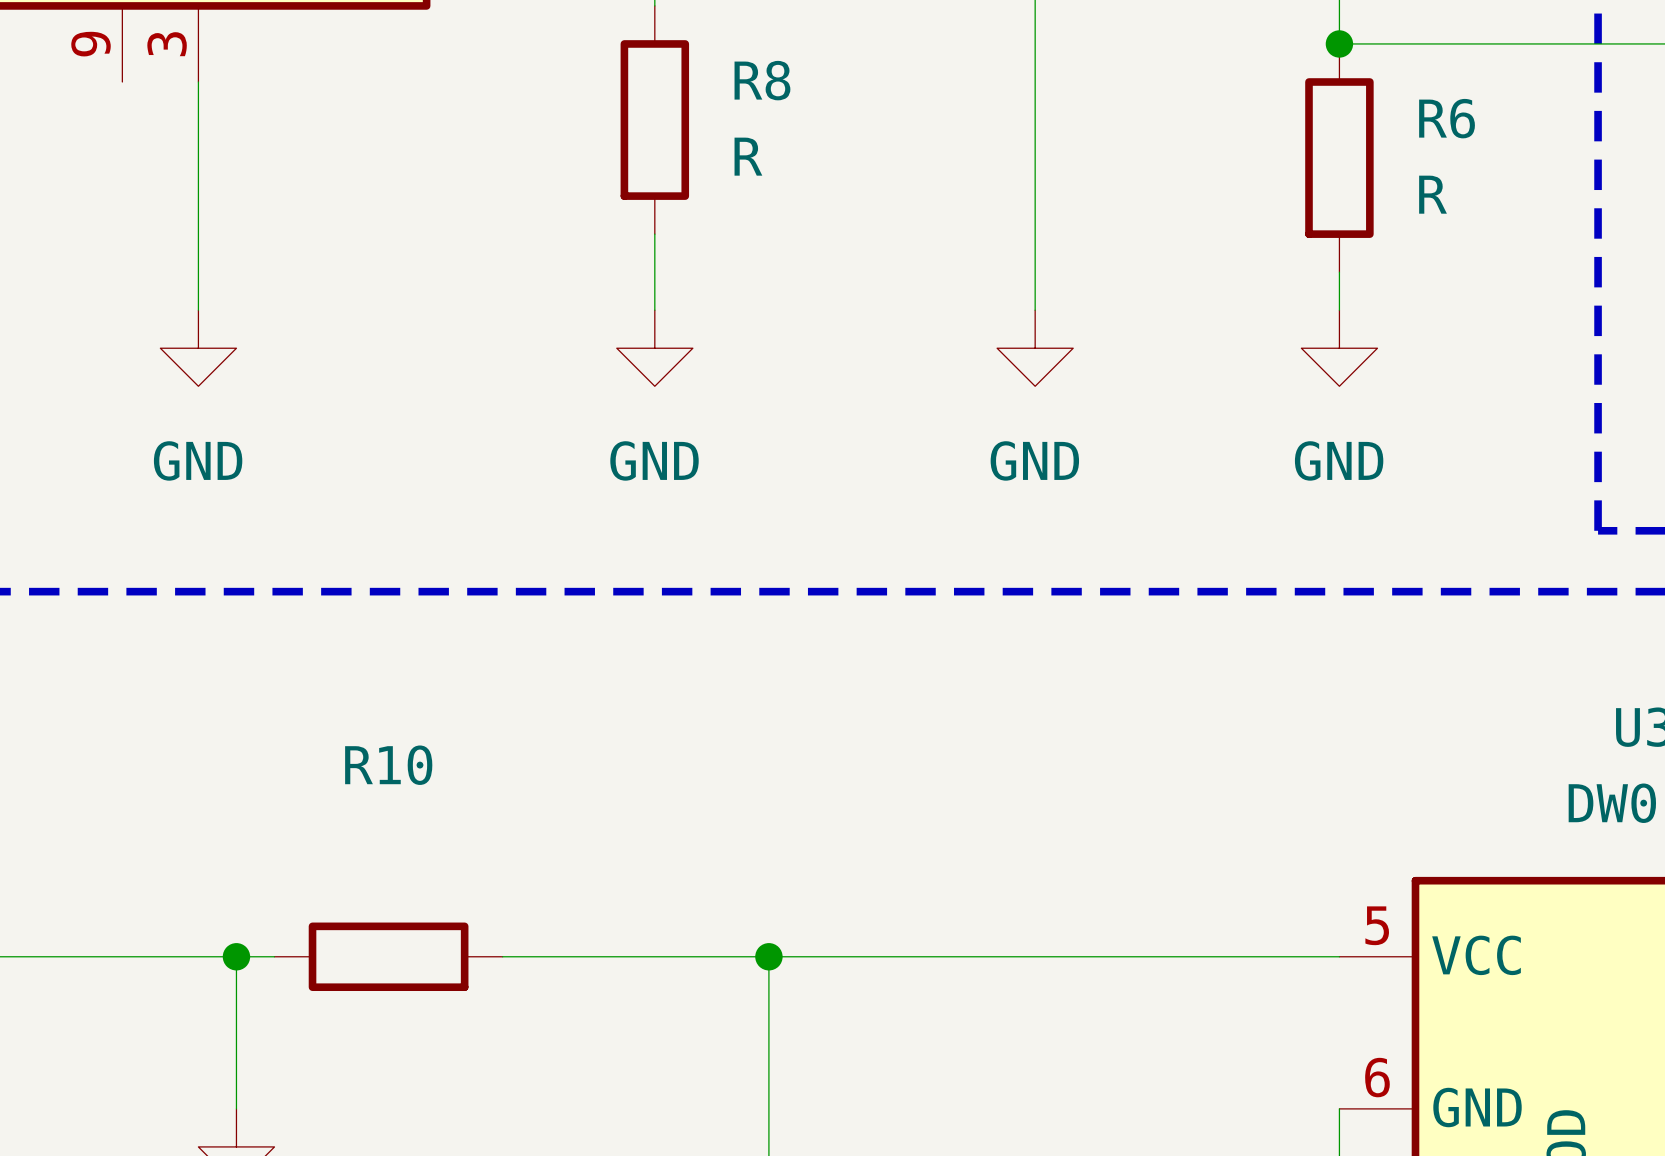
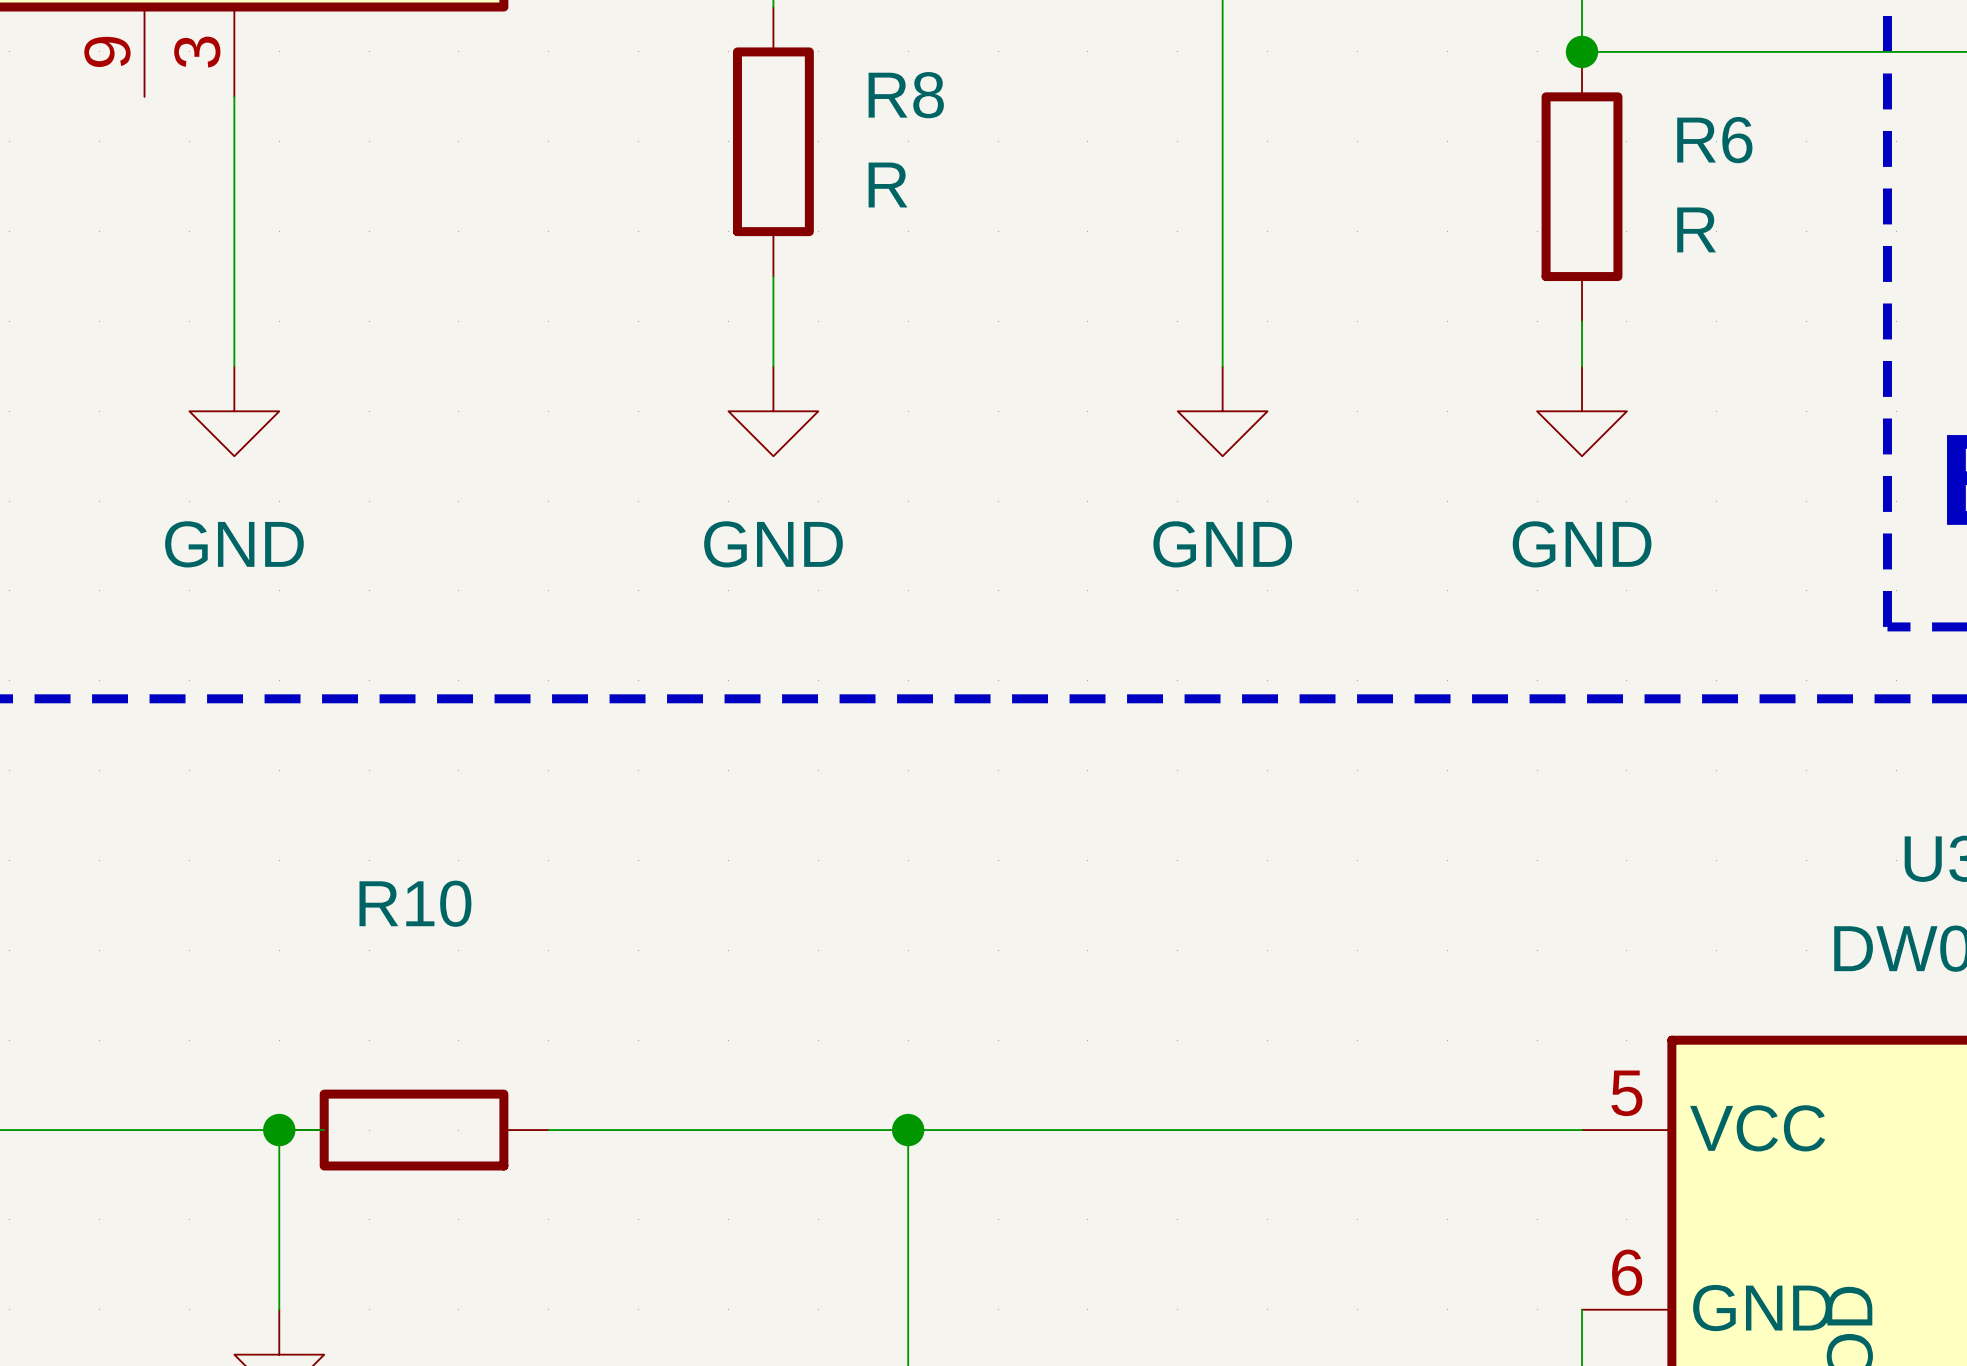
R10 position: (388, 956) -> (414, 1130)

